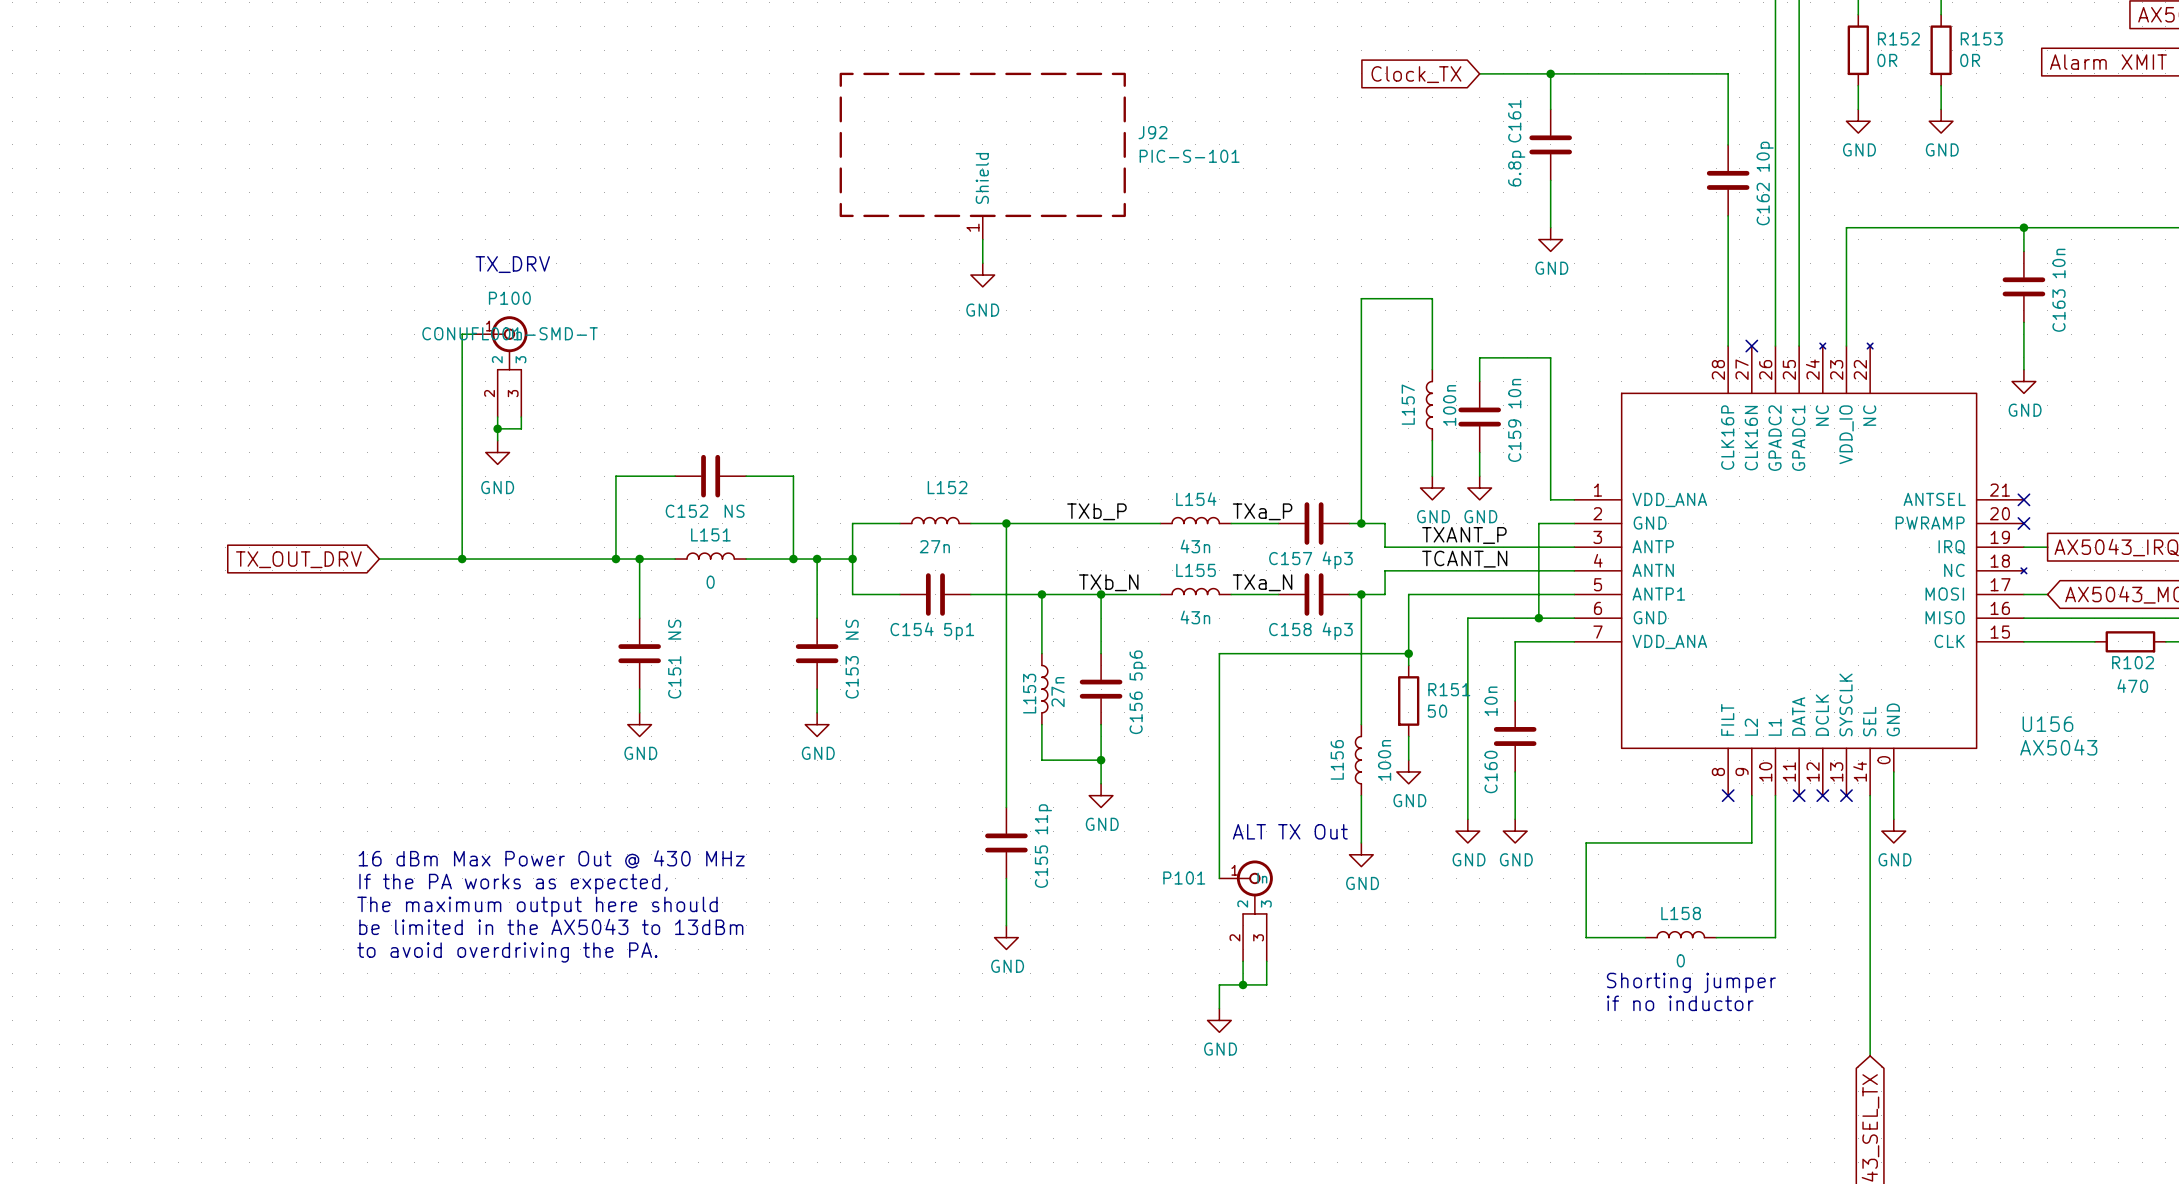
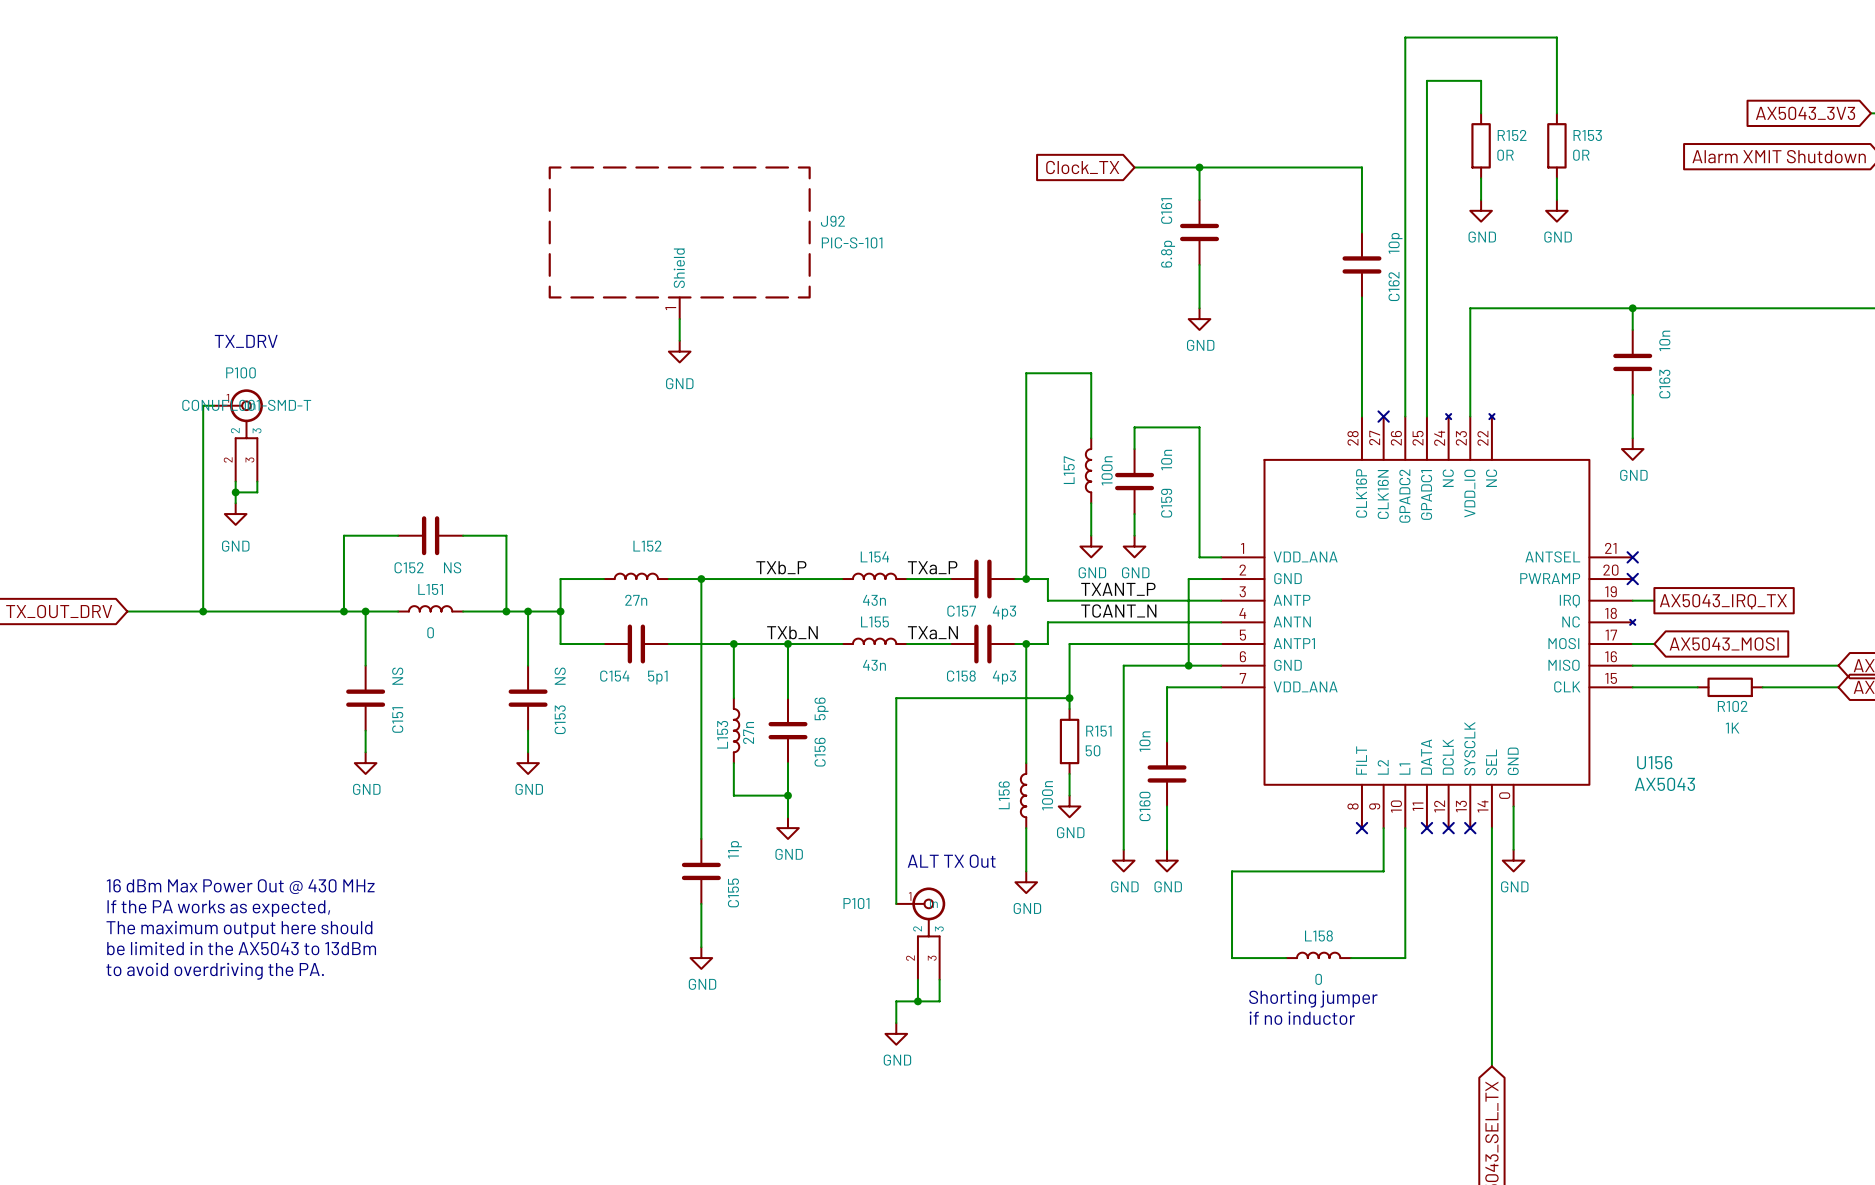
R102 value: 470 (2132, 686) -> 1K (1732, 728)

